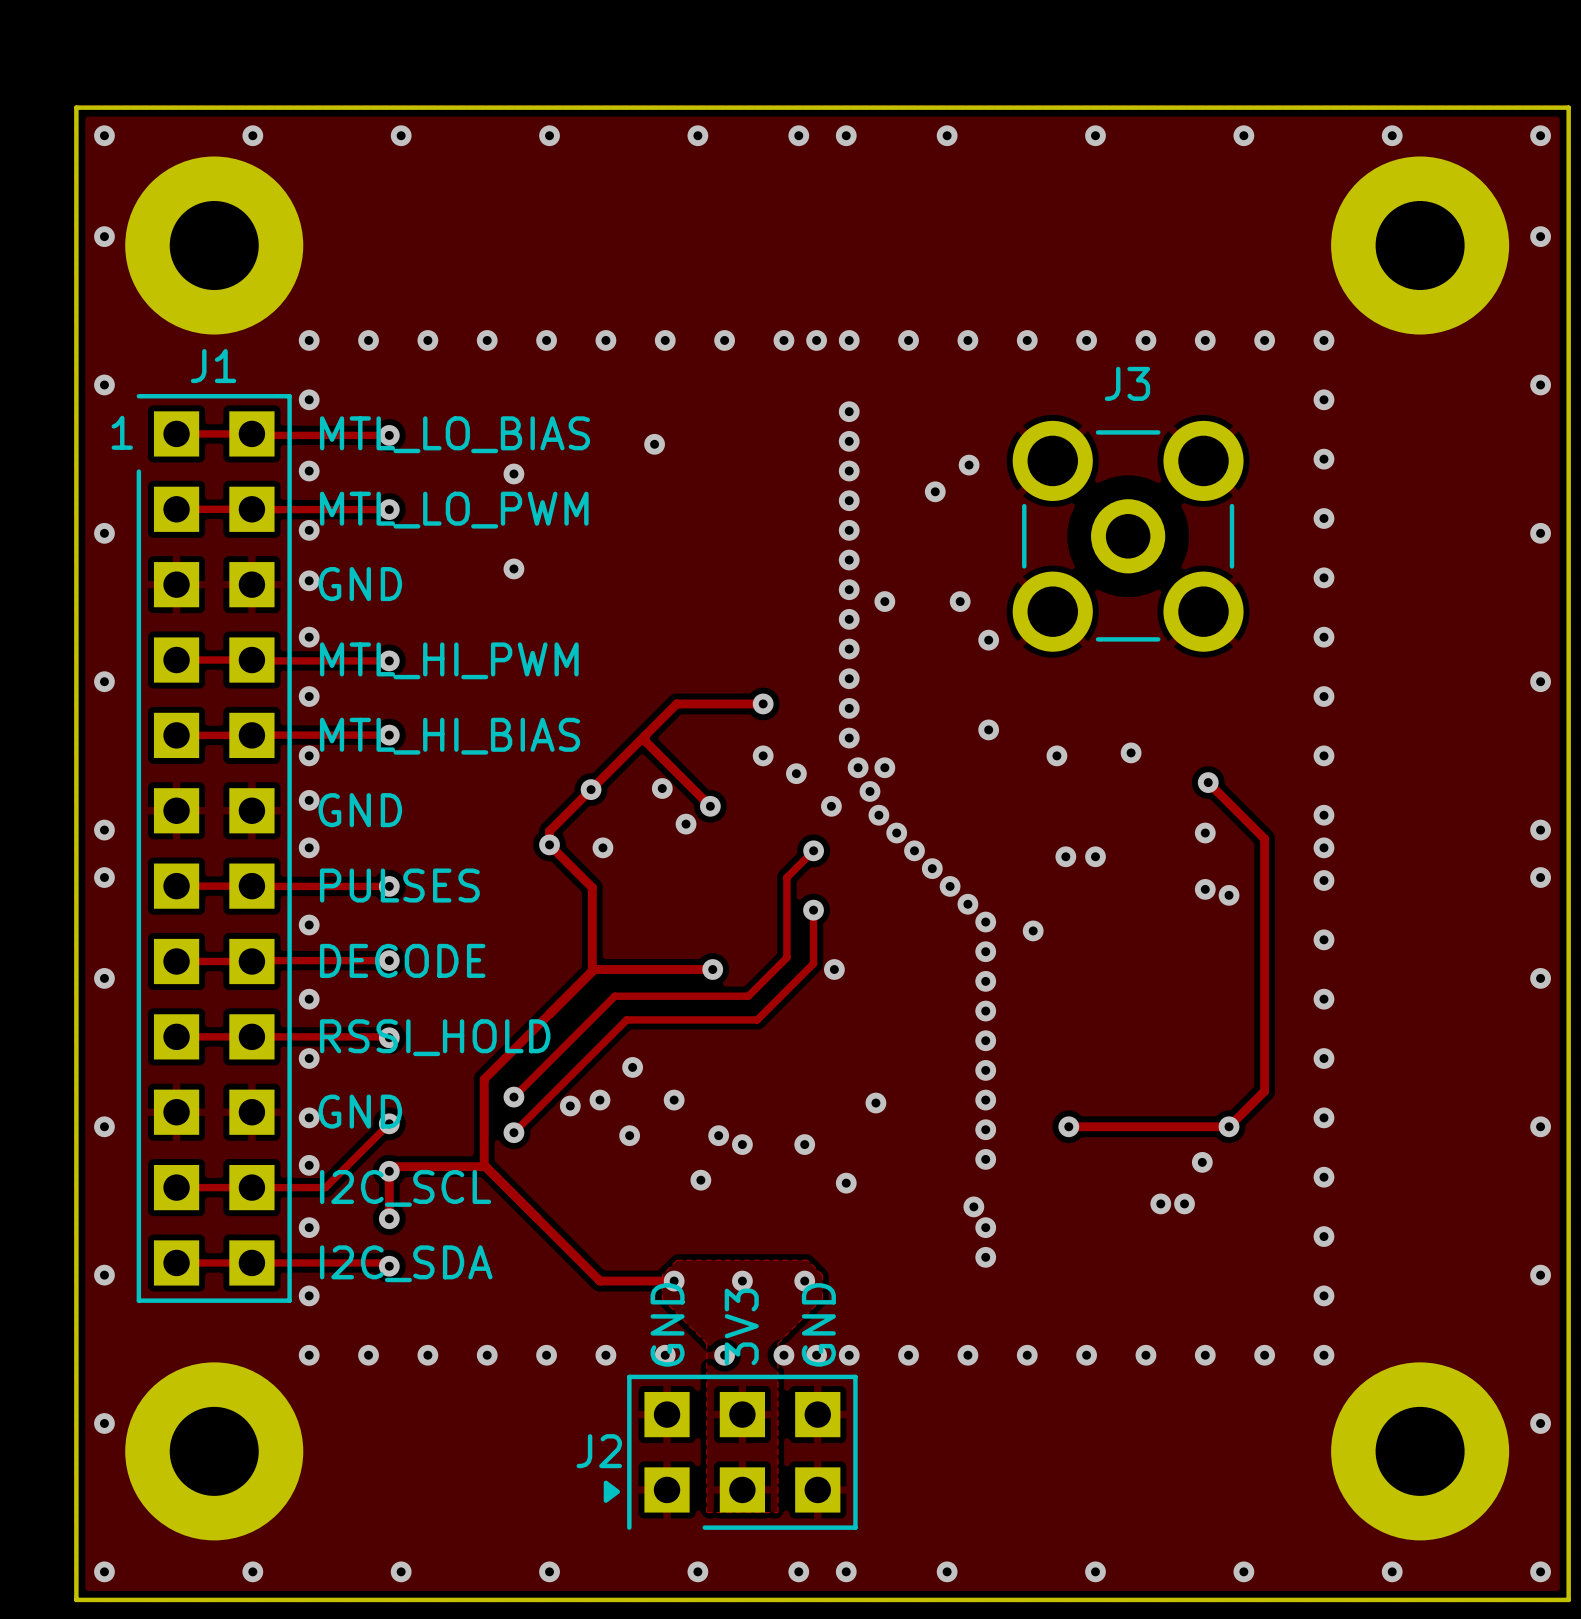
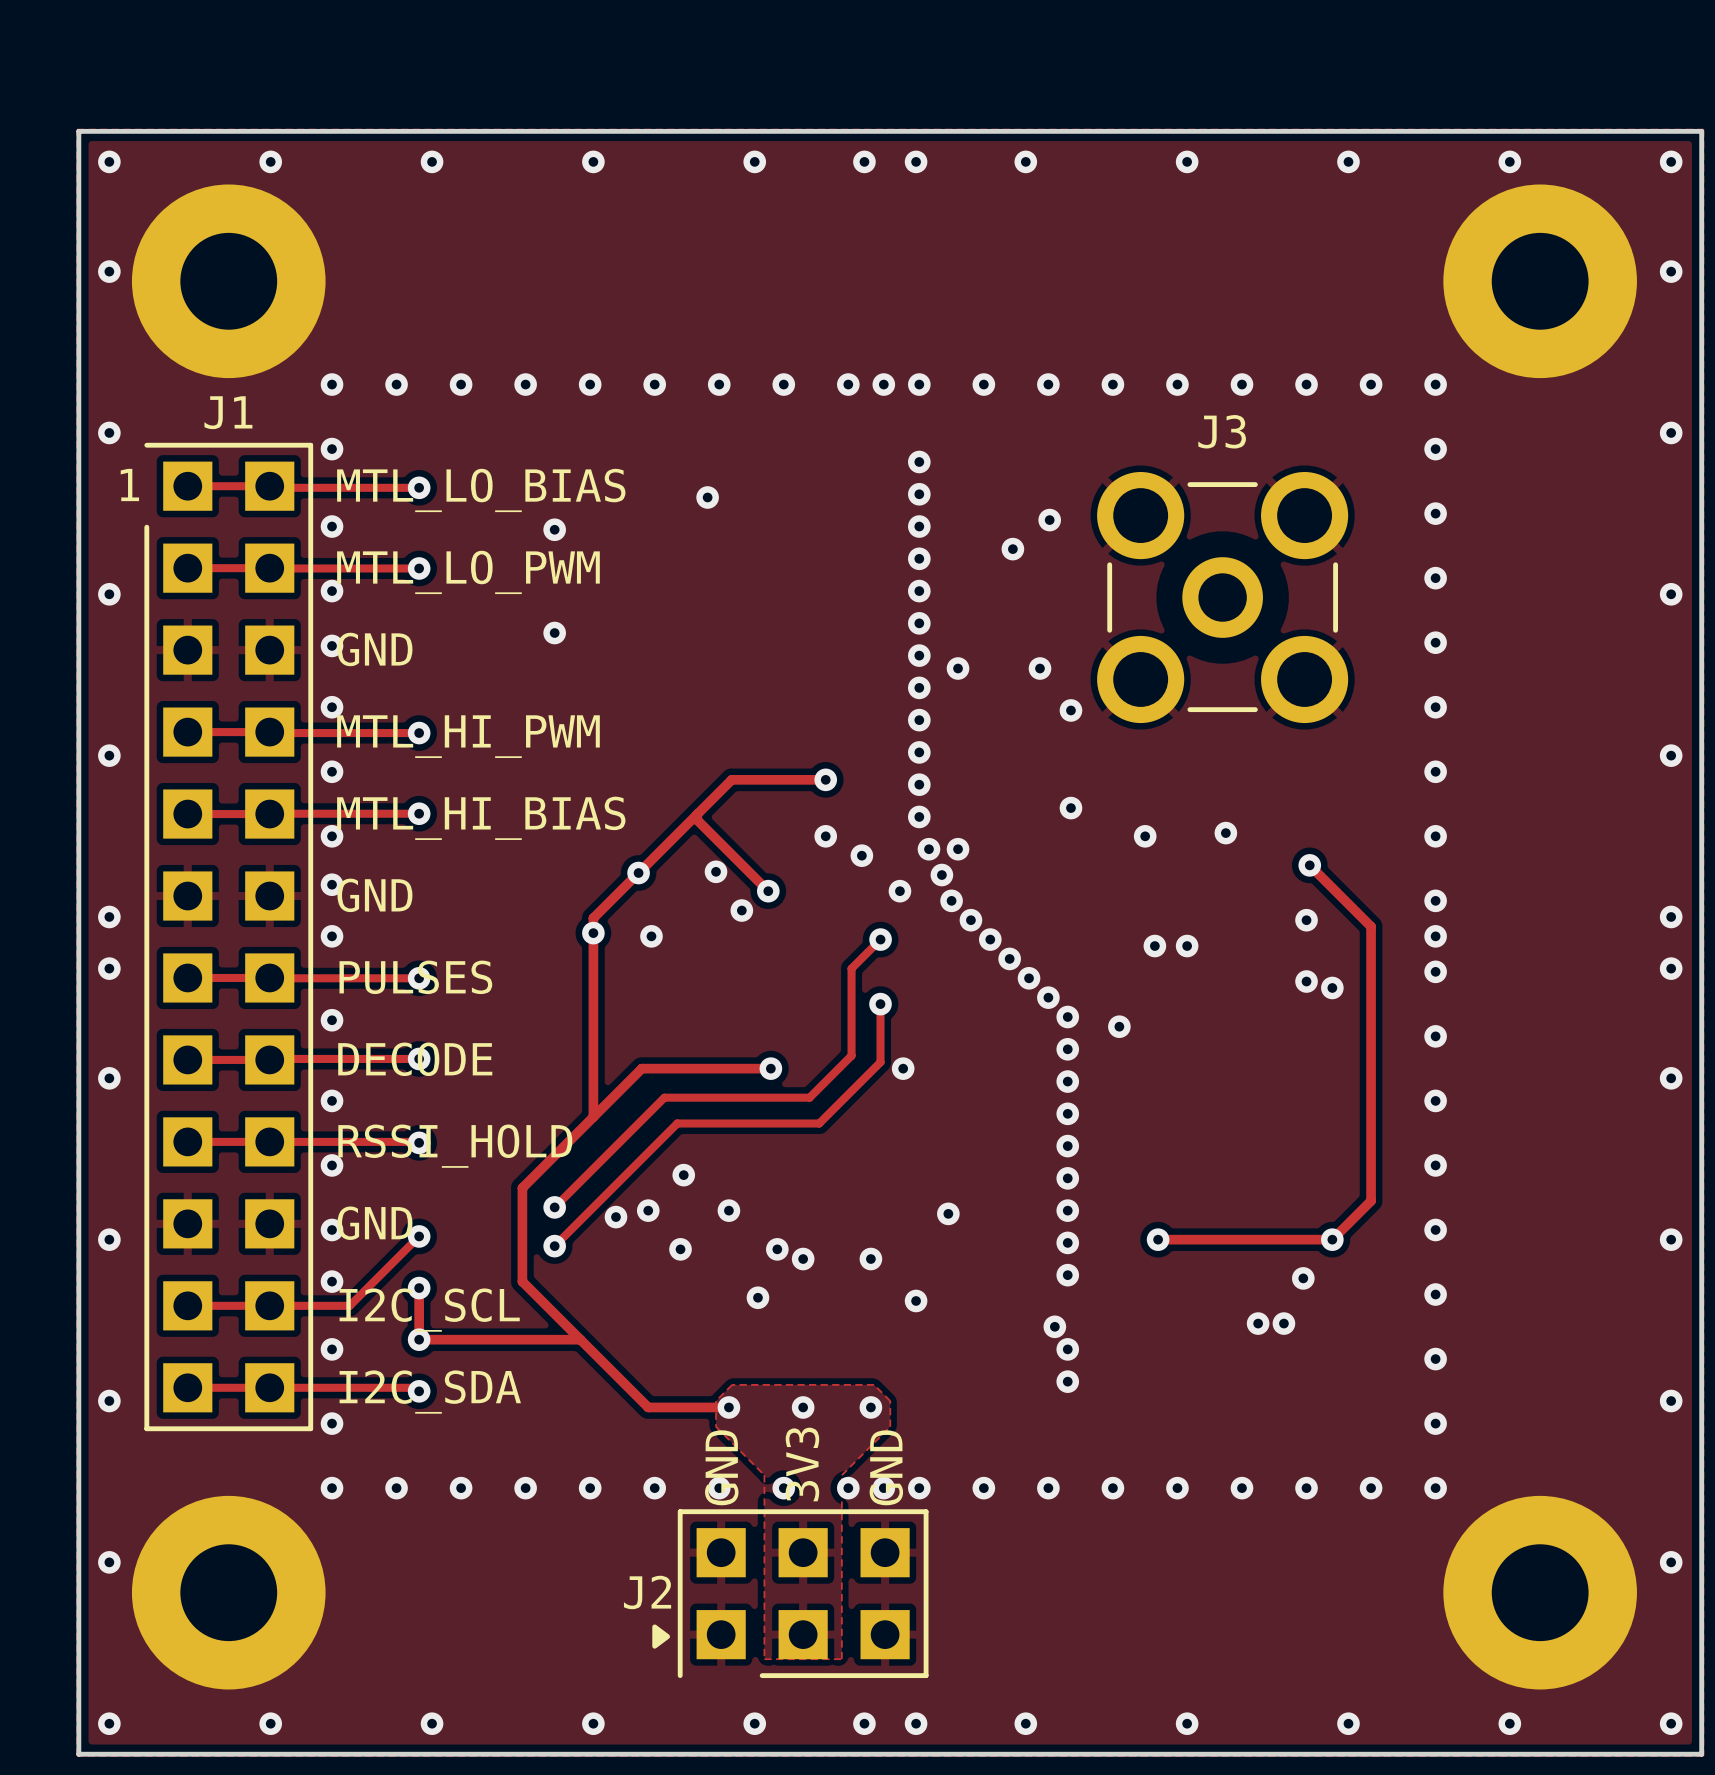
track: (549, 844) (592, 887) (592, 971) -> (593, 933) (593, 1117)
track: (485, 1166) (393, 1166) (389, 1171) -> none
track: none -> (419, 1339) (580, 1339)

